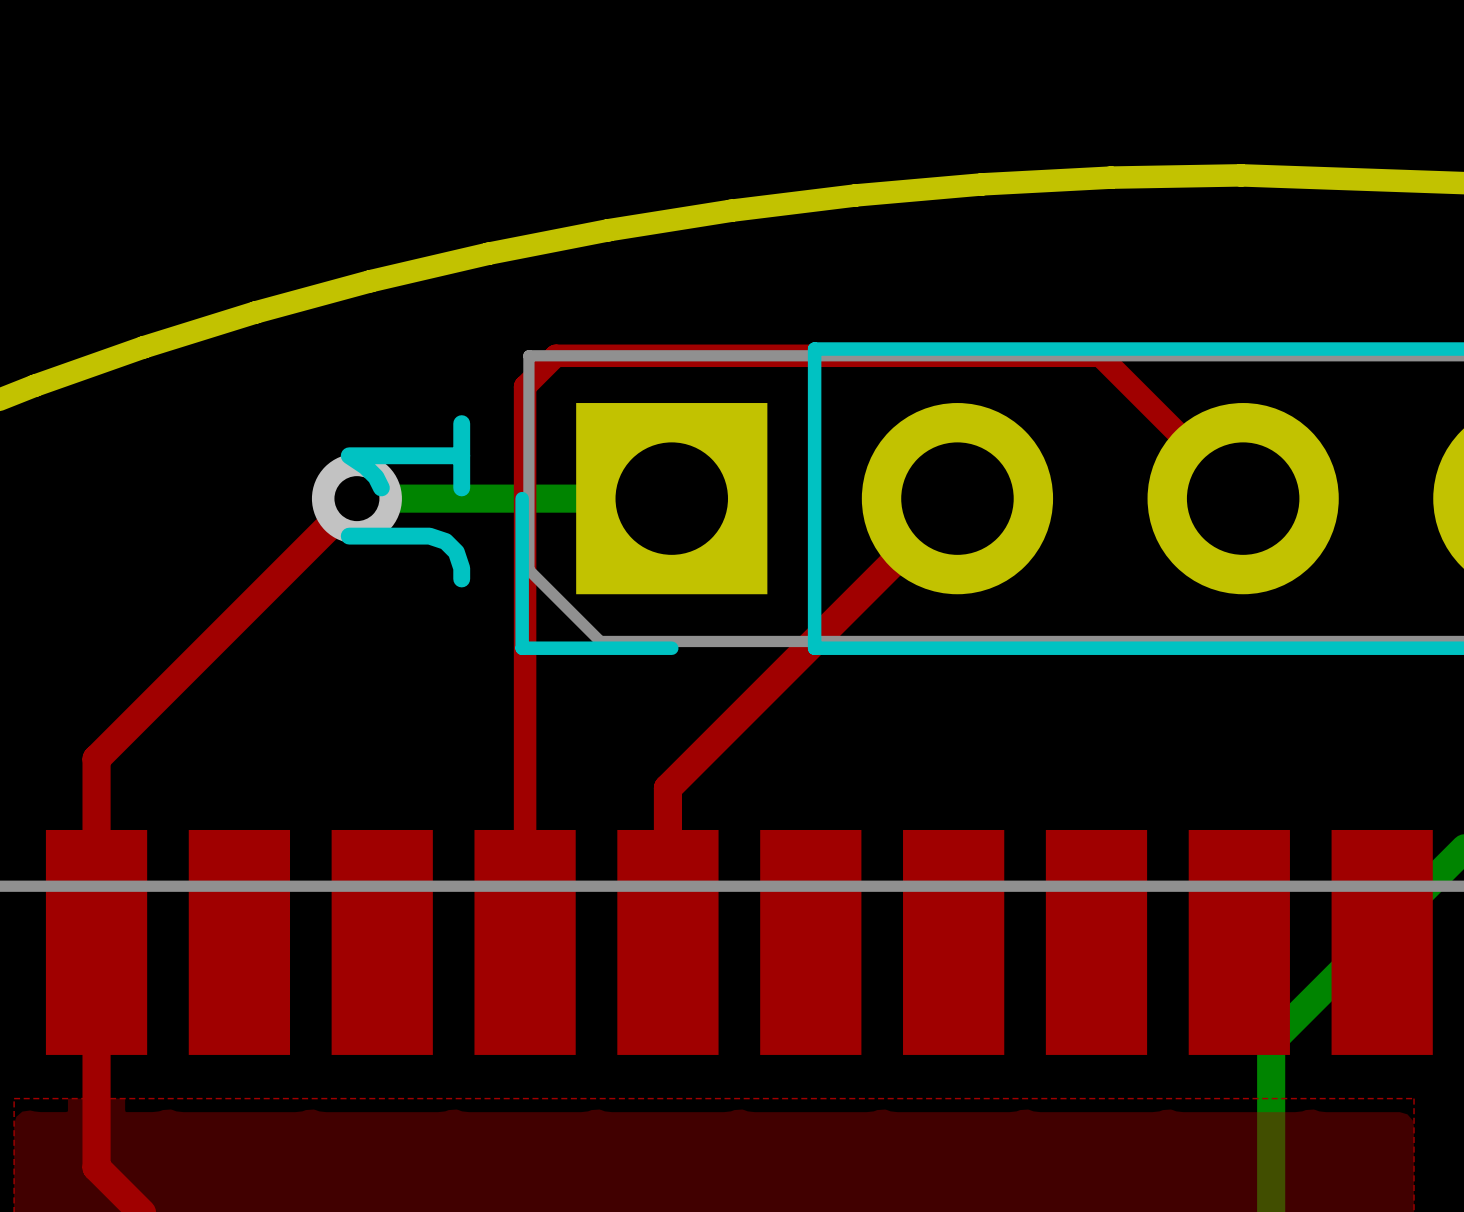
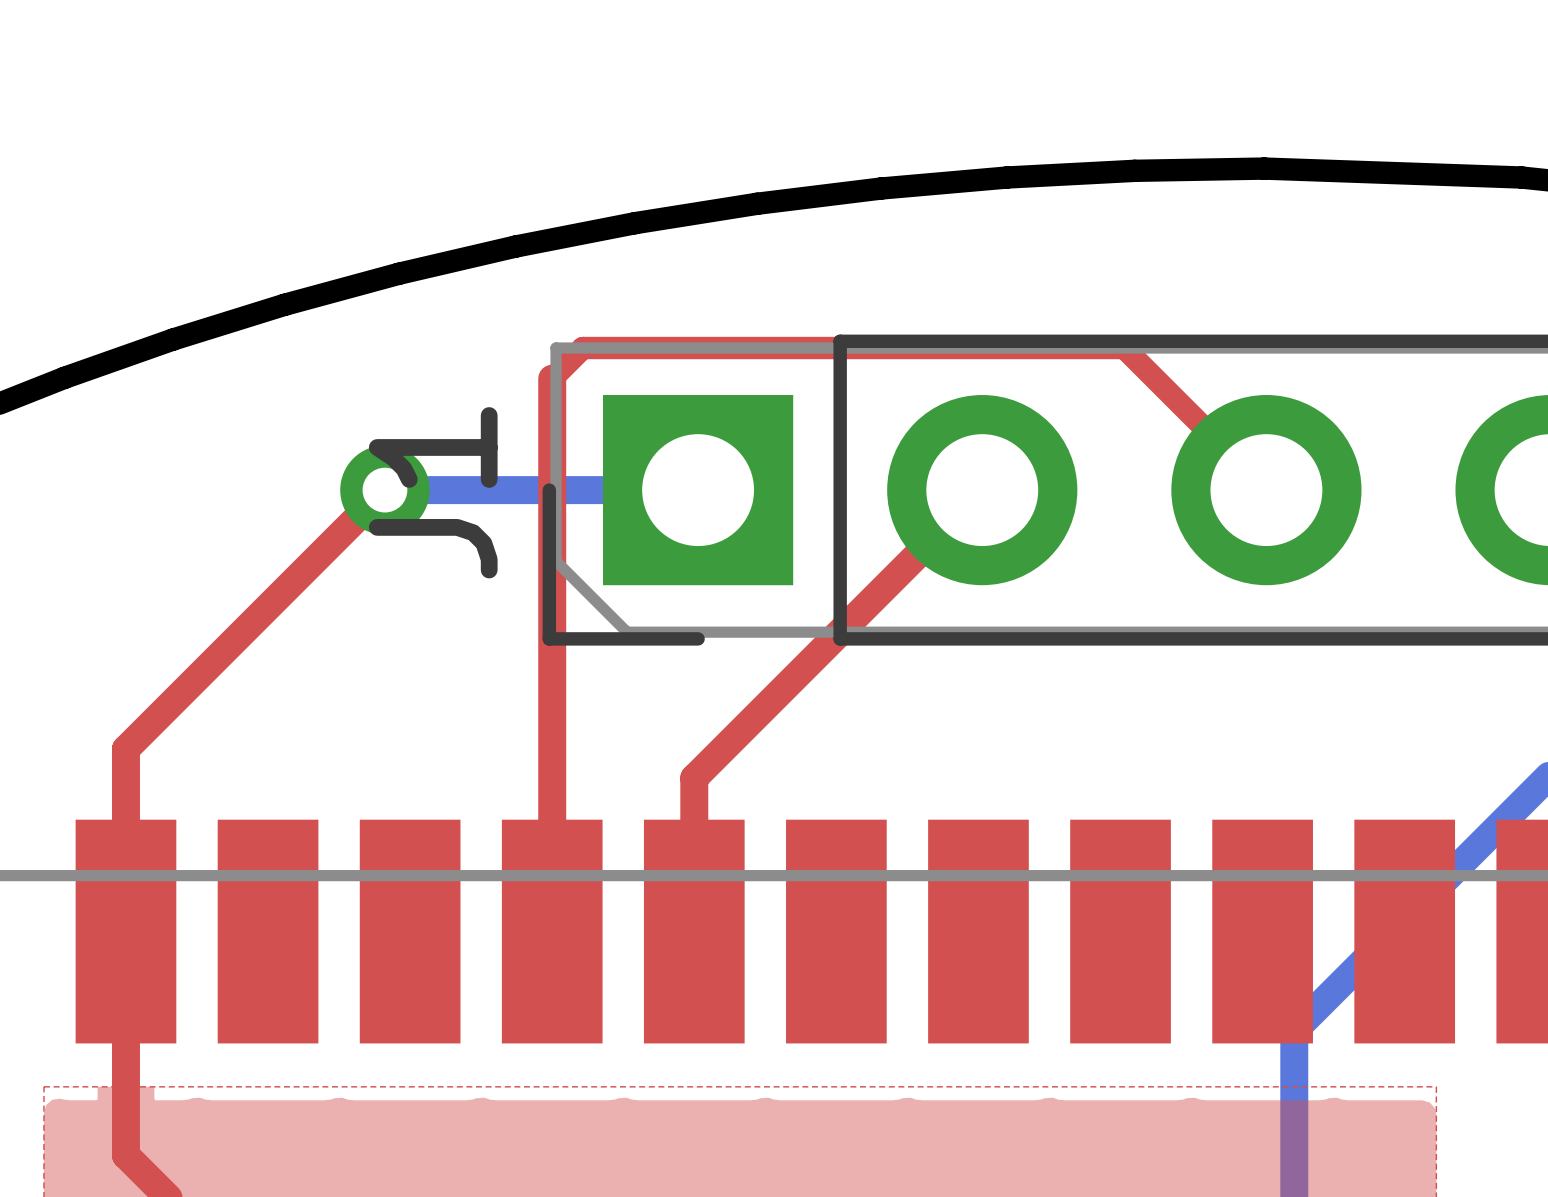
top track width: thin (525, 386) (525, 942) -> thick (552, 378) (552, 931)

